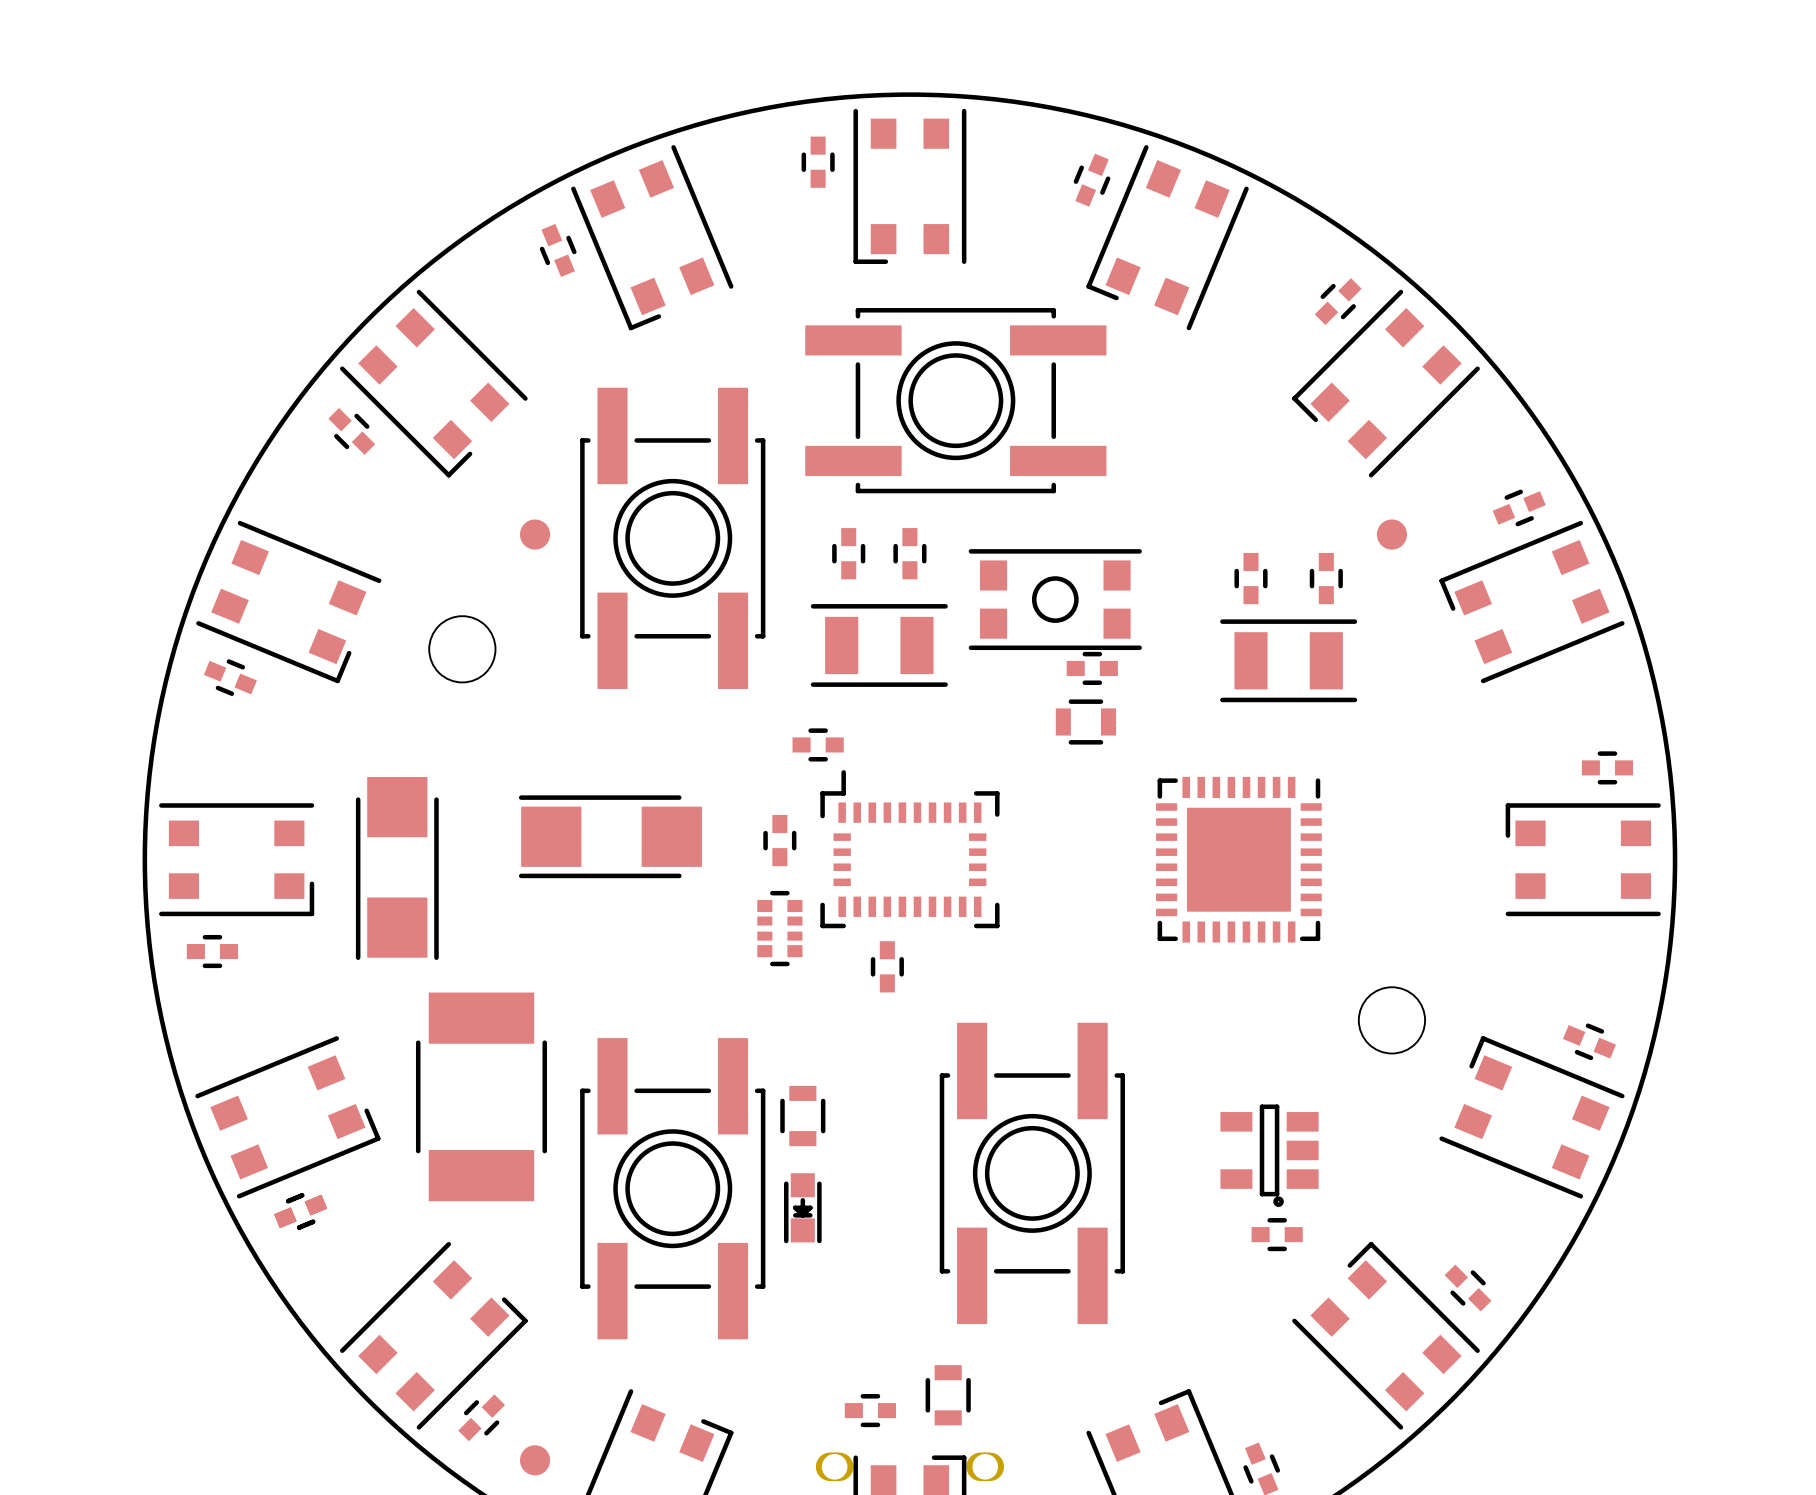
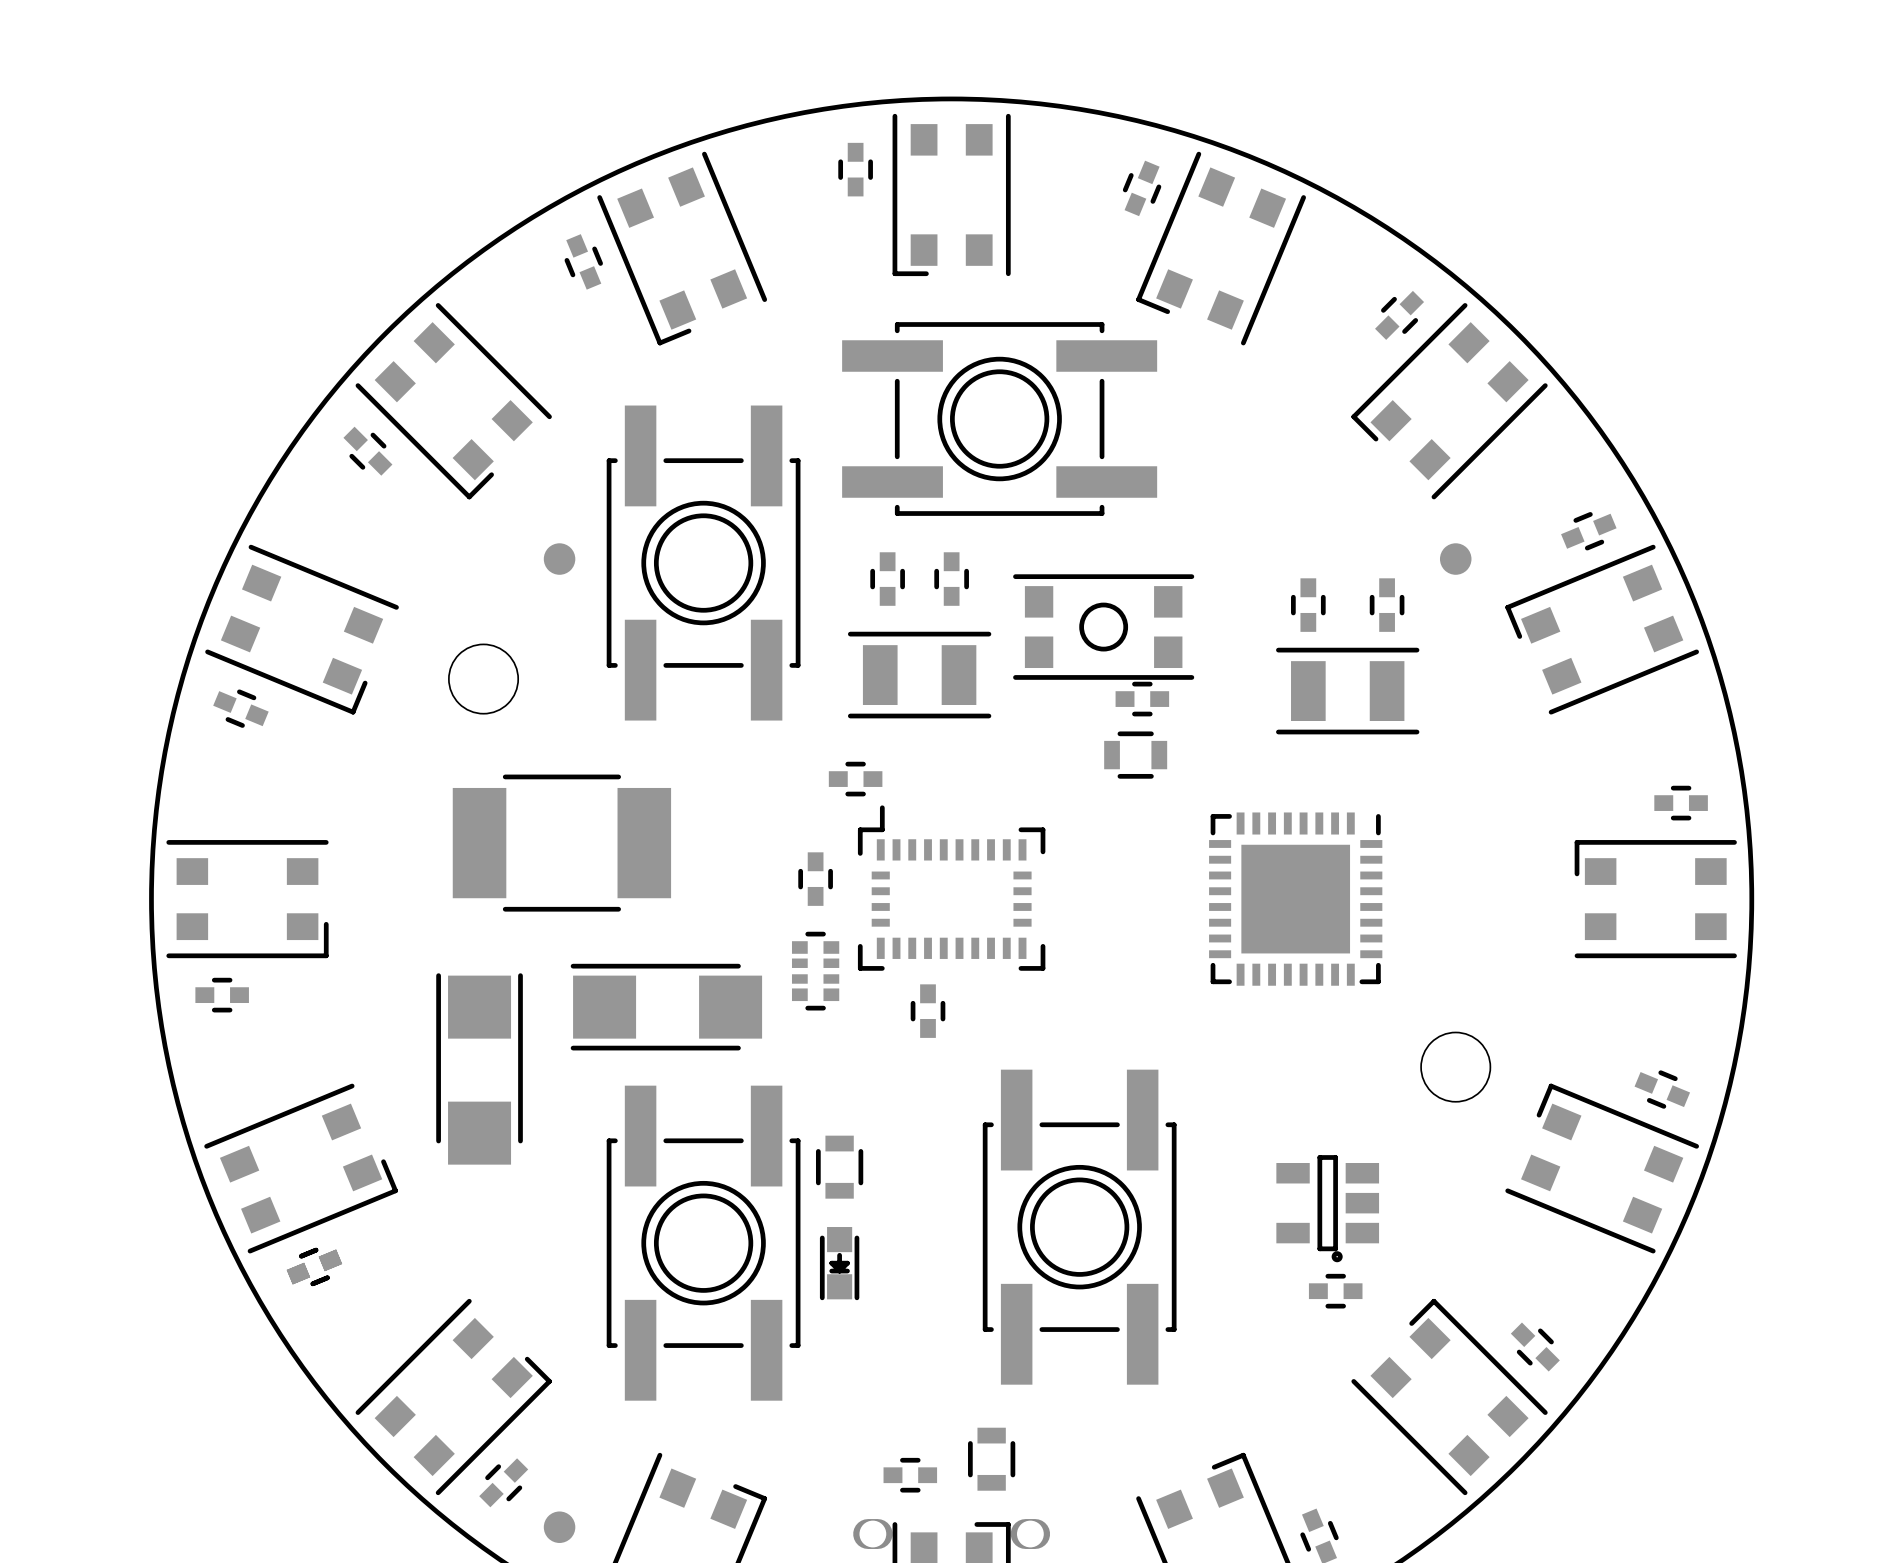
part: (610, 836) -> none
part: (397, 868) -> none
part: none -> (666, 1007)
part: none -> (479, 1068)
part rotation: 0° (481, 1096) -> 90° clockwise (561, 843)
part position: (481, 1096) -> (561, 843)

